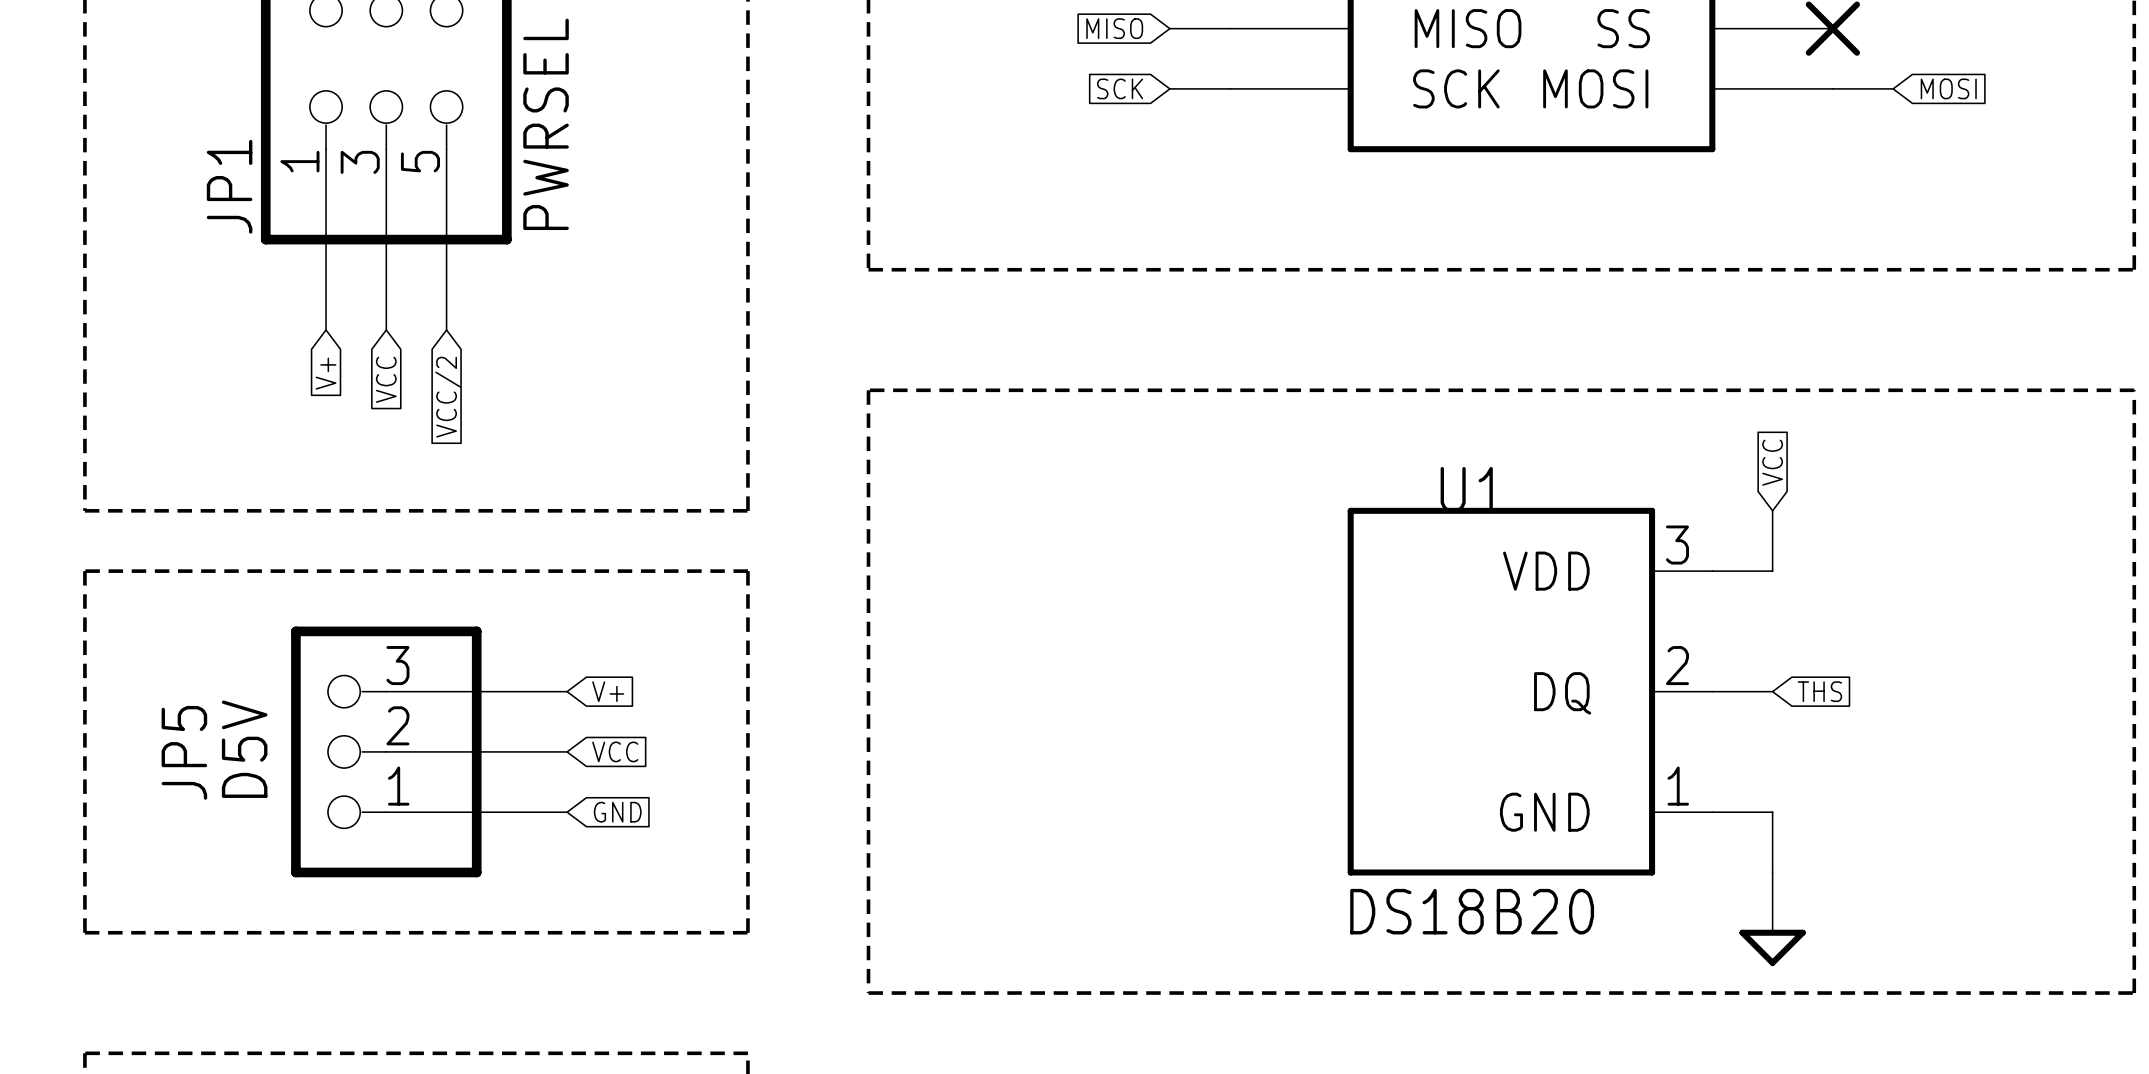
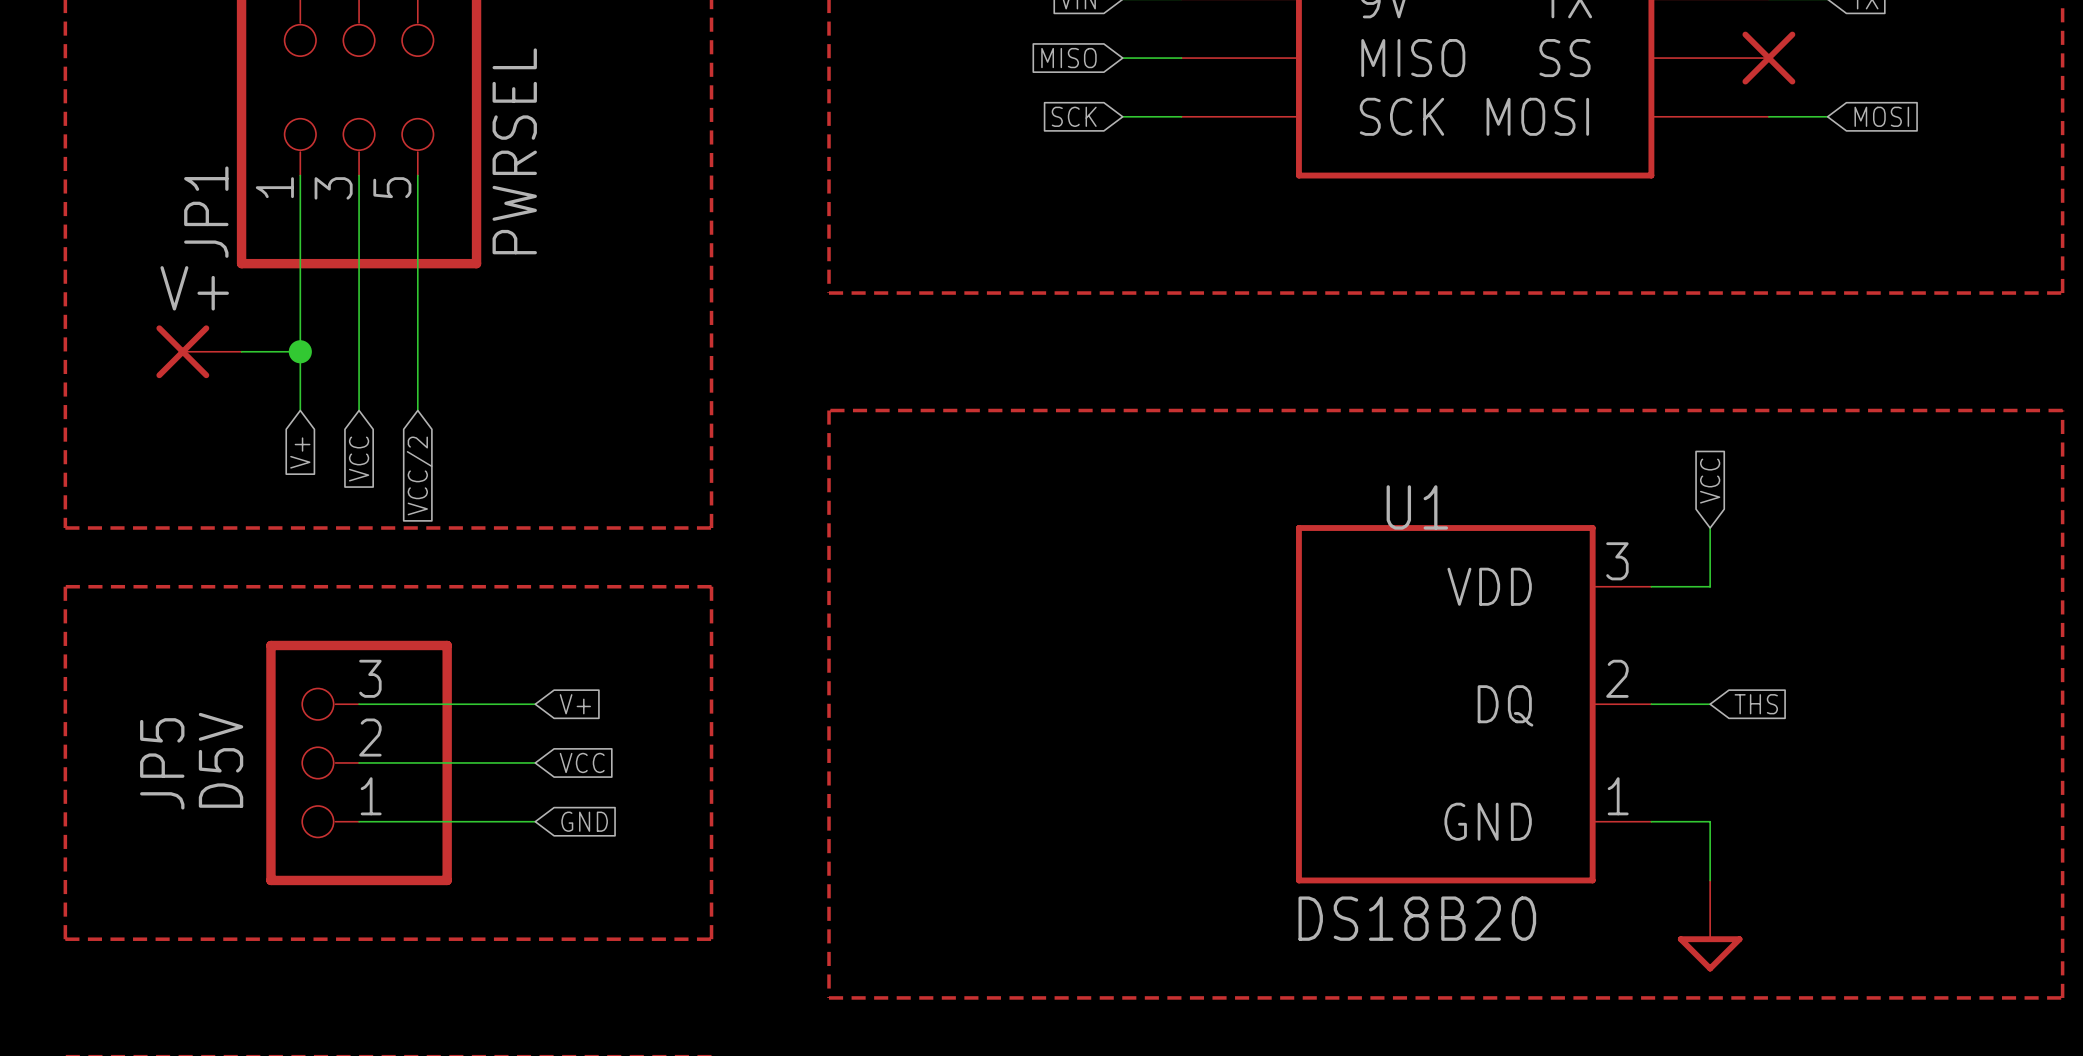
V+: none -> (198, 351)
wire: none -> (241, 351) (300, 351) (300, 410)
junction: none -> (300, 351)
wire: none -> (359, 351) (359, 410)
wire: none -> (417, 351) (417, 410)
global label position: V+ (326, 373) -> V+ (300, 452)
global label position: VCC (386, 379) -> VCC (359, 459)
global label position: VCC/2 (448, 397) -> VCC/2 (419, 475)

